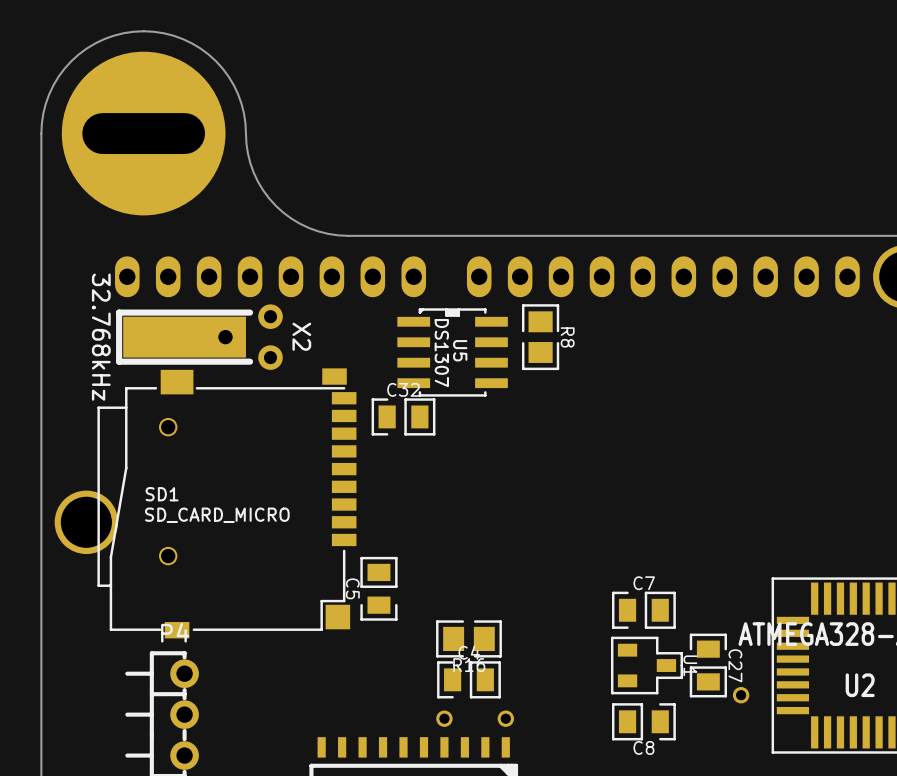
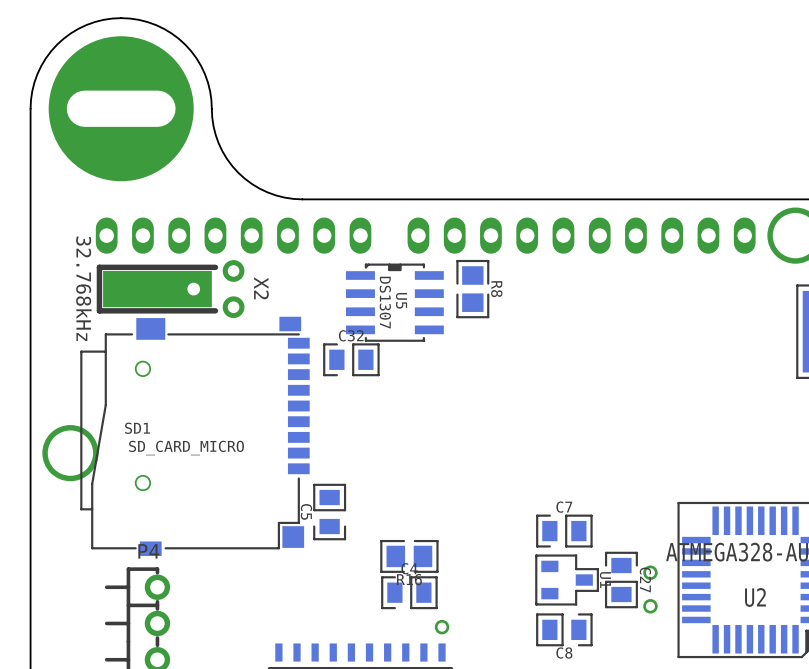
part position: (444, 718) -> (650, 572)

